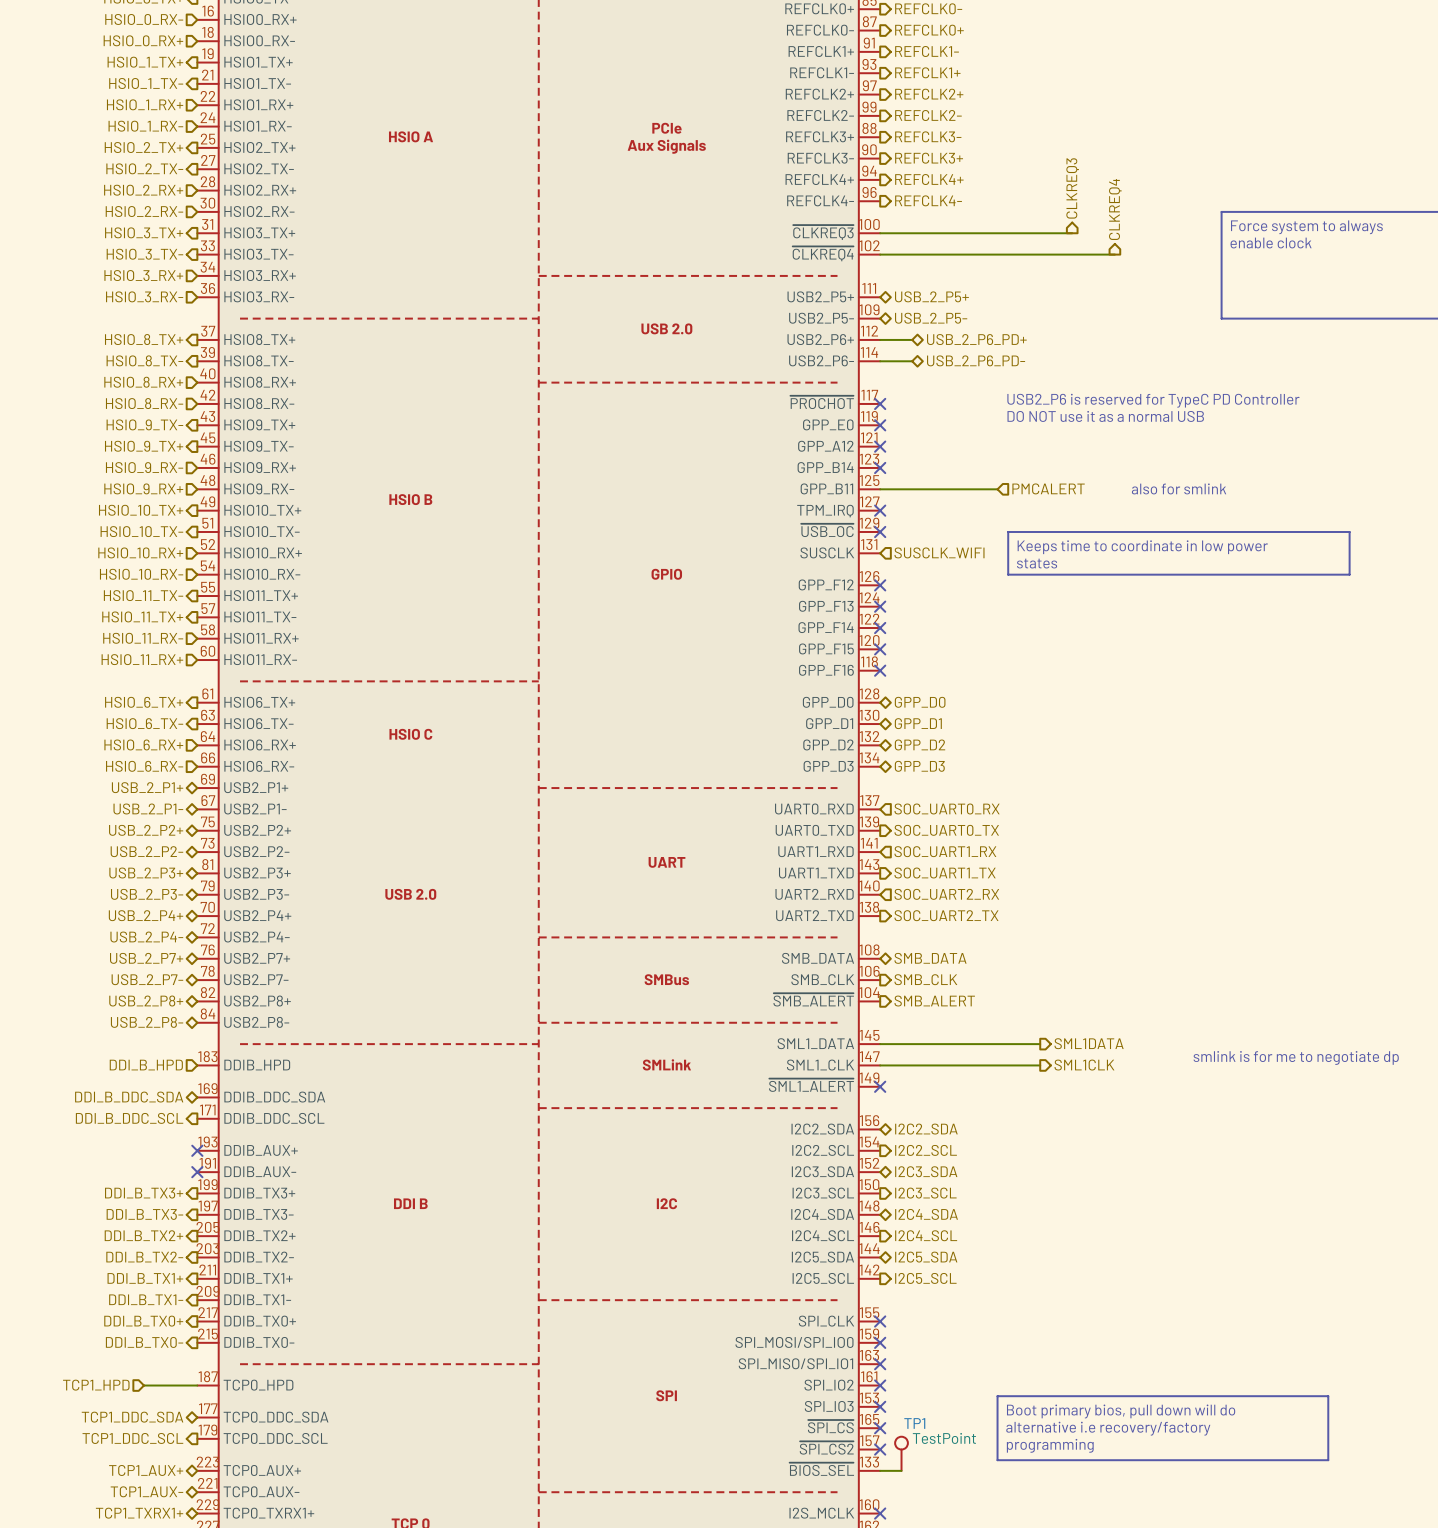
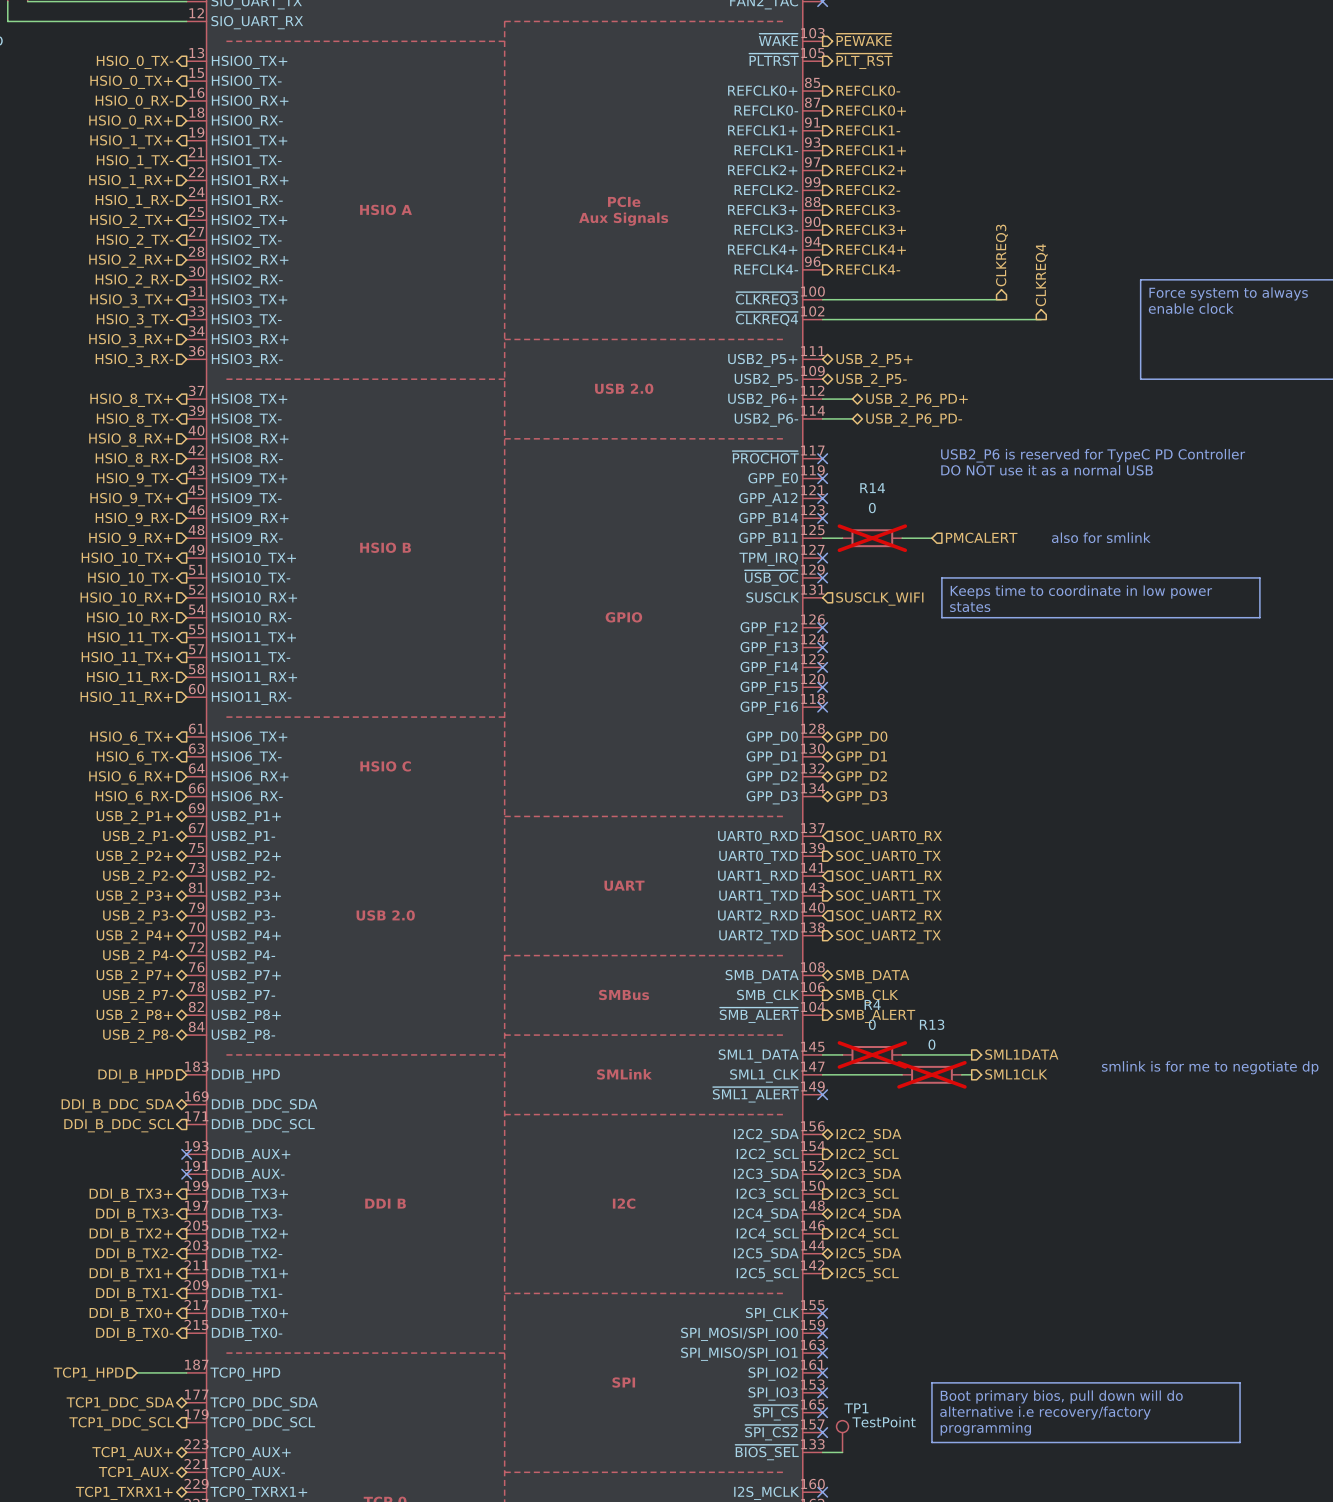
R14: none -> 0 (872, 538)
R4: none -> 0 (872, 1054)
R13: none -> 0 (931, 1074)

